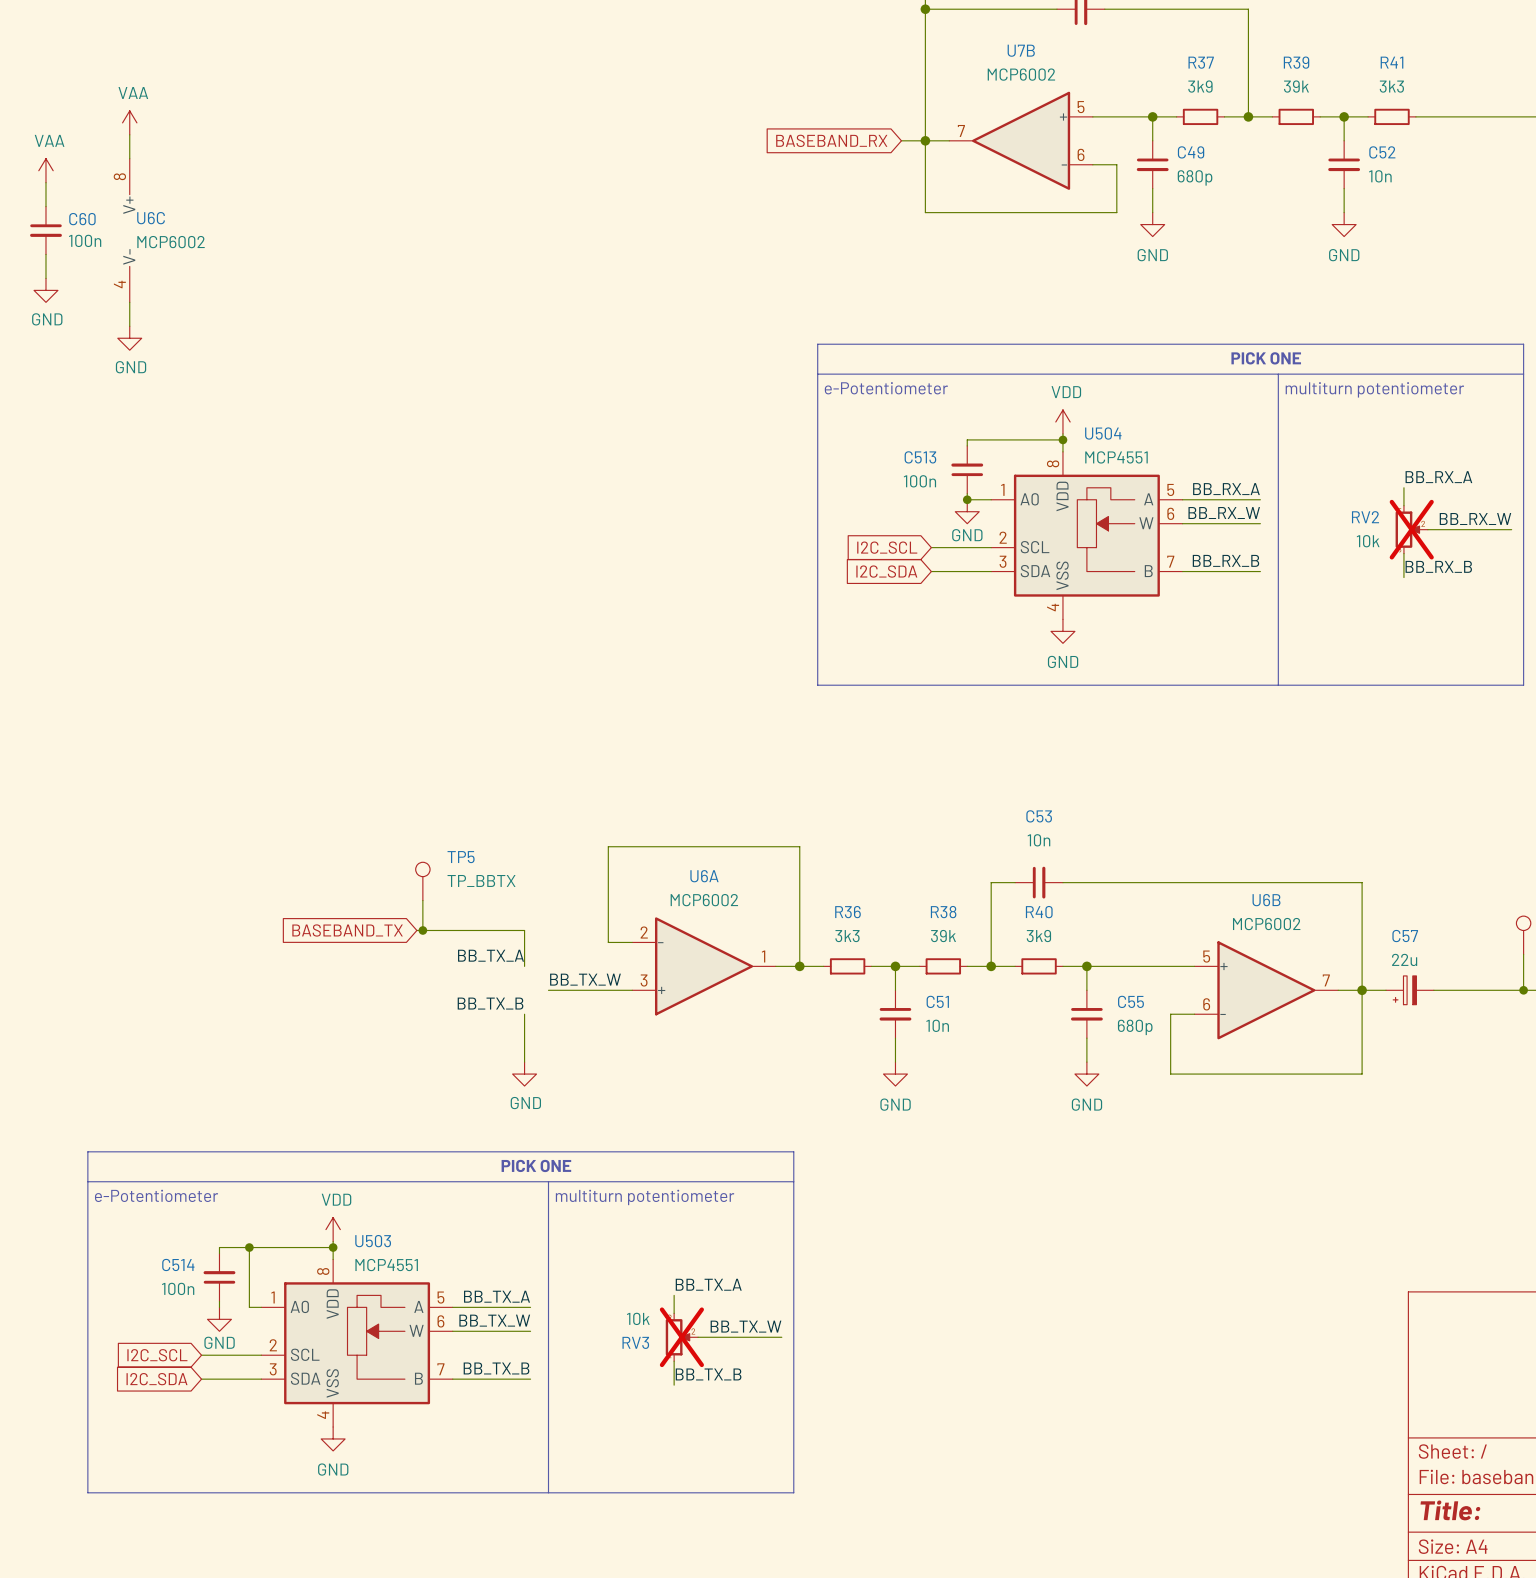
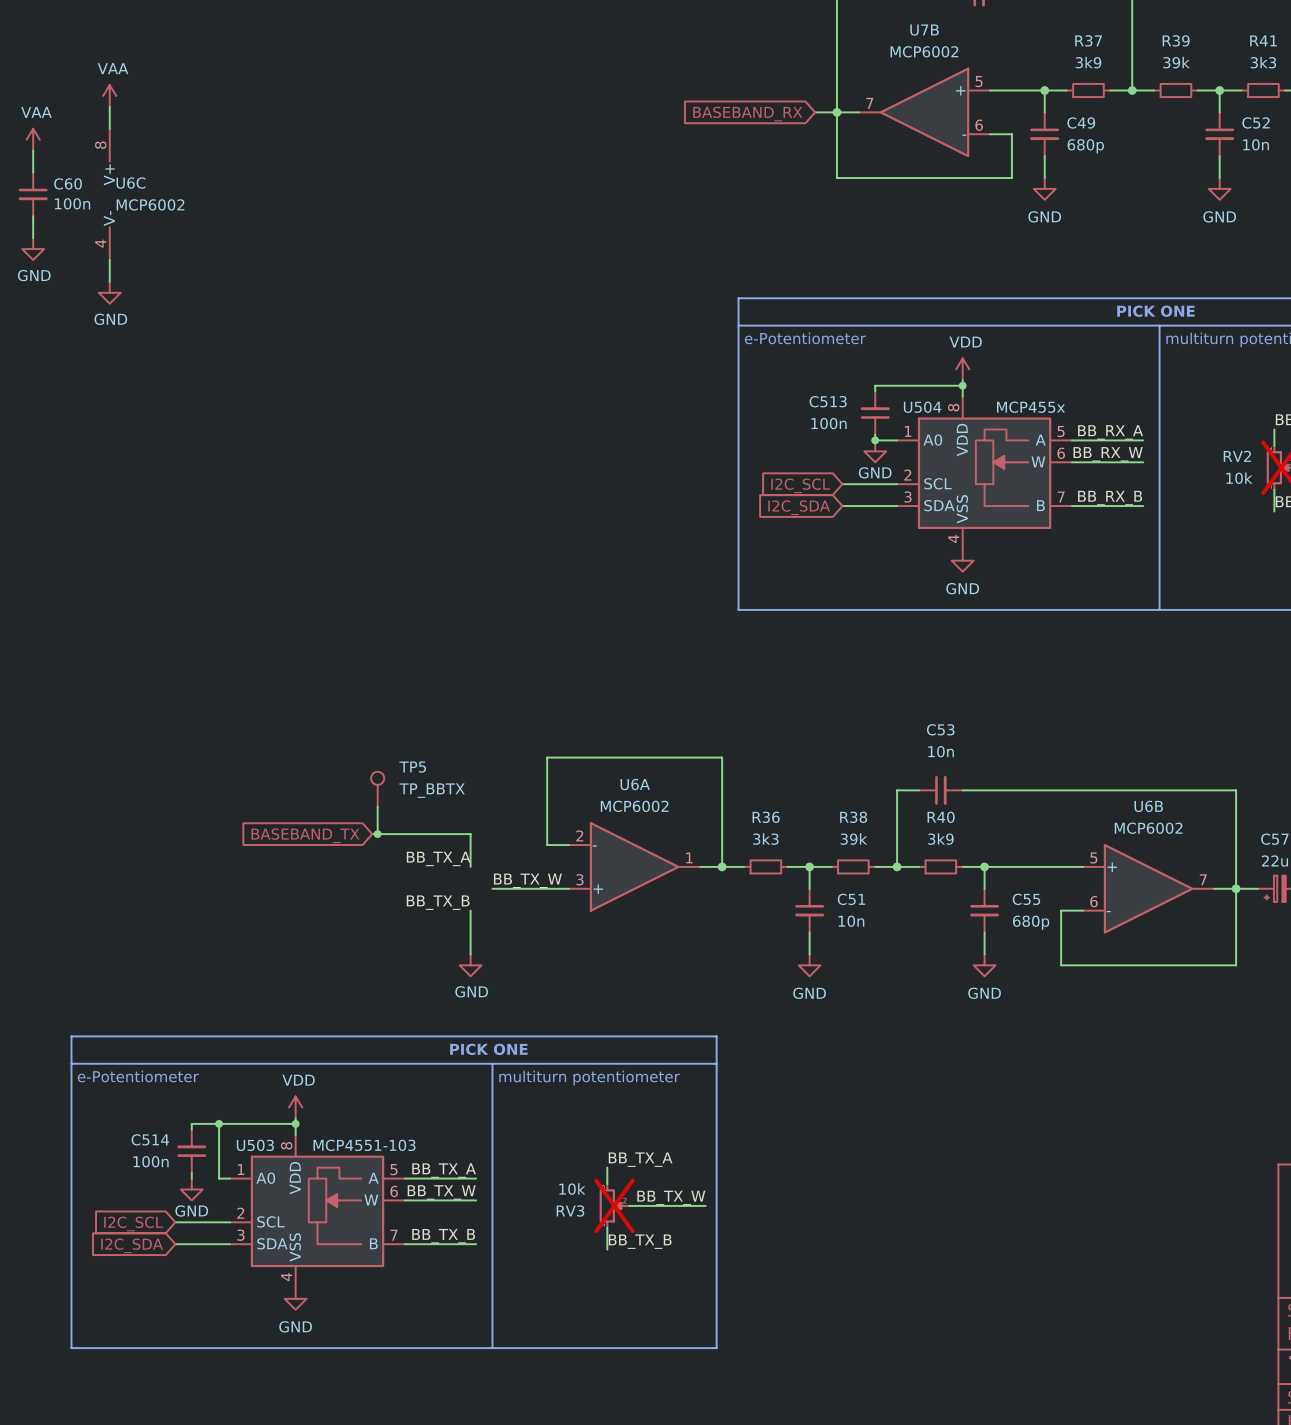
U504 name position: U504 (1103, 433) -> U504 (922, 407)
U504 value: MCP4551 (1116, 457) -> MCP455x (1030, 407)
U503 name position: U503 (373, 1241) -> U503 (255, 1145)
U503 value: MCP4551 (386, 1265) -> MCP4551-103 (364, 1145)

